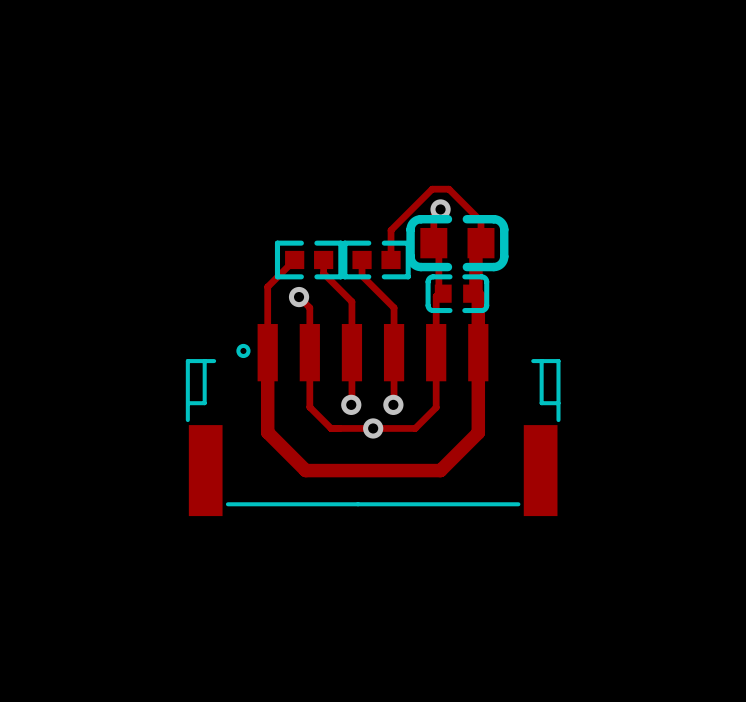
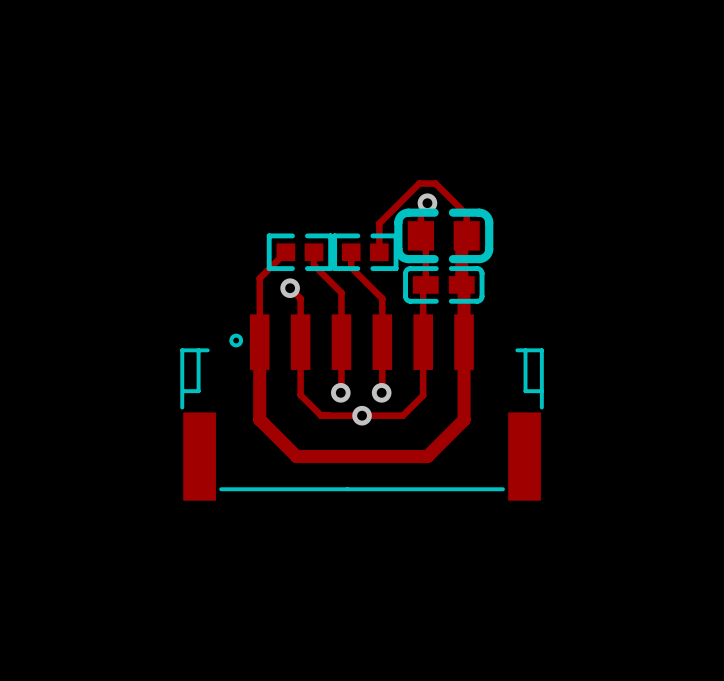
part footprint: [425, 274, 490, 314] -> [403, 266, 485, 304]

